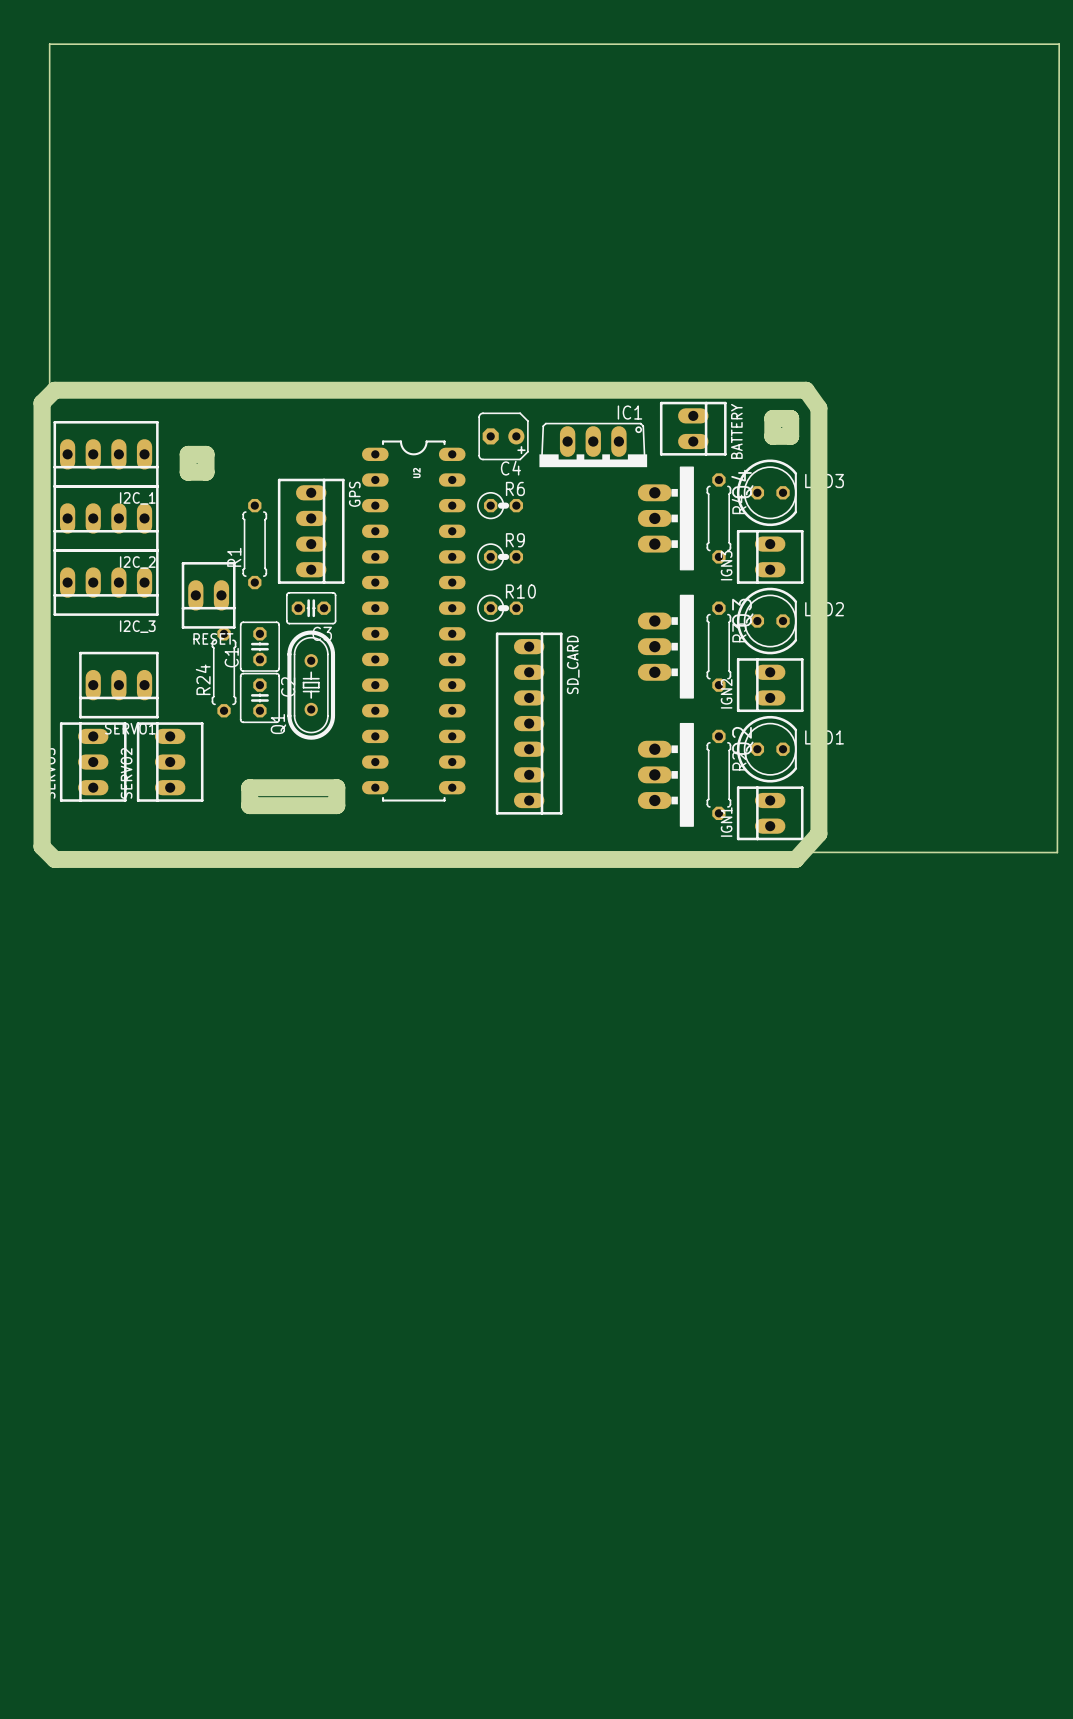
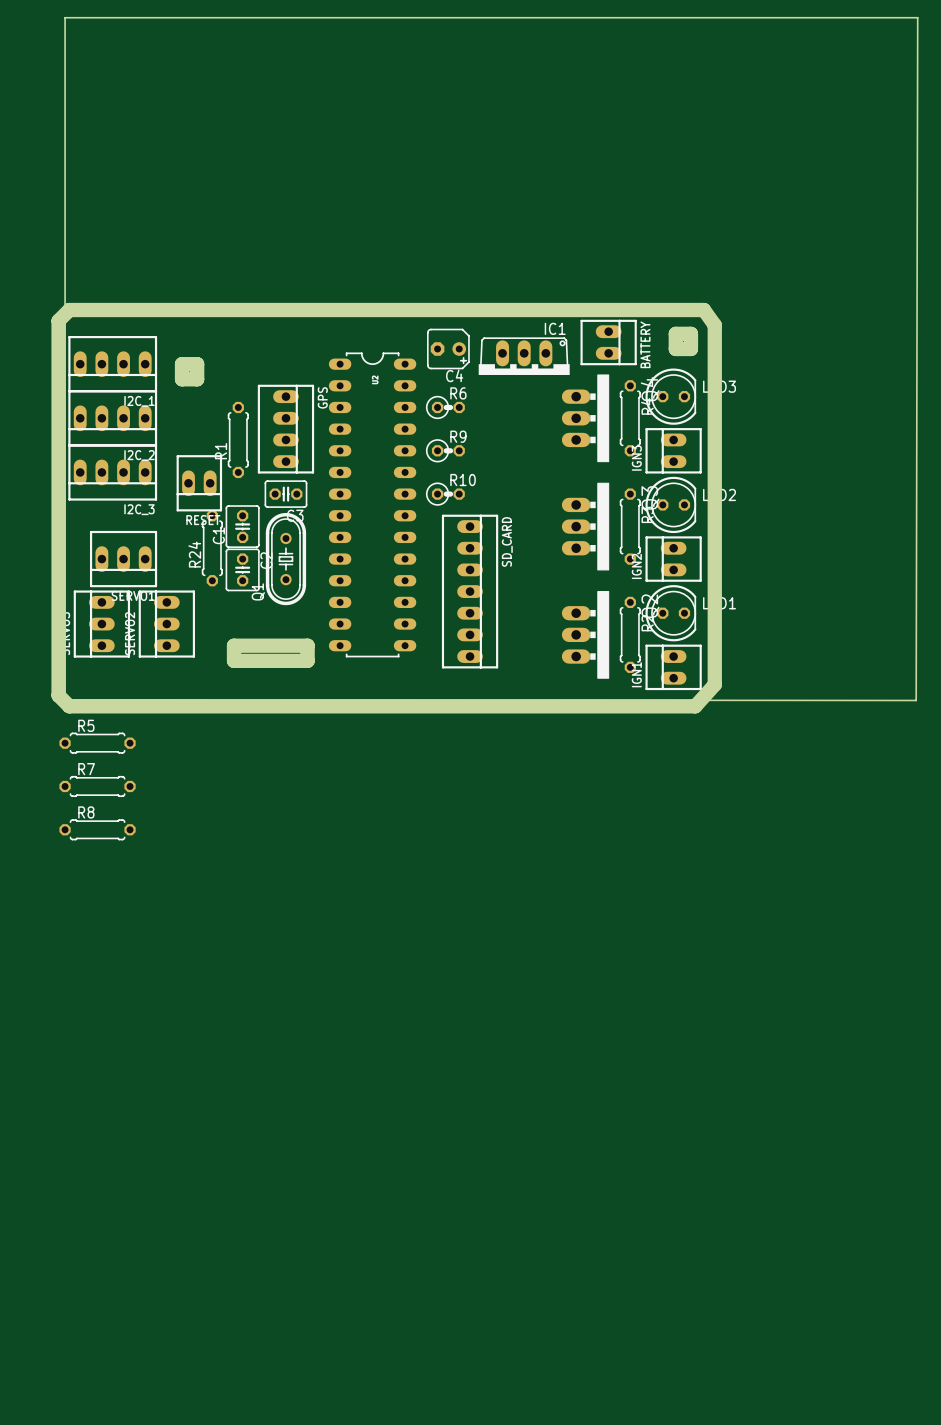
R5: none -> (97, 743)
R7: none -> (97, 786)
R8: none -> (97, 829)

